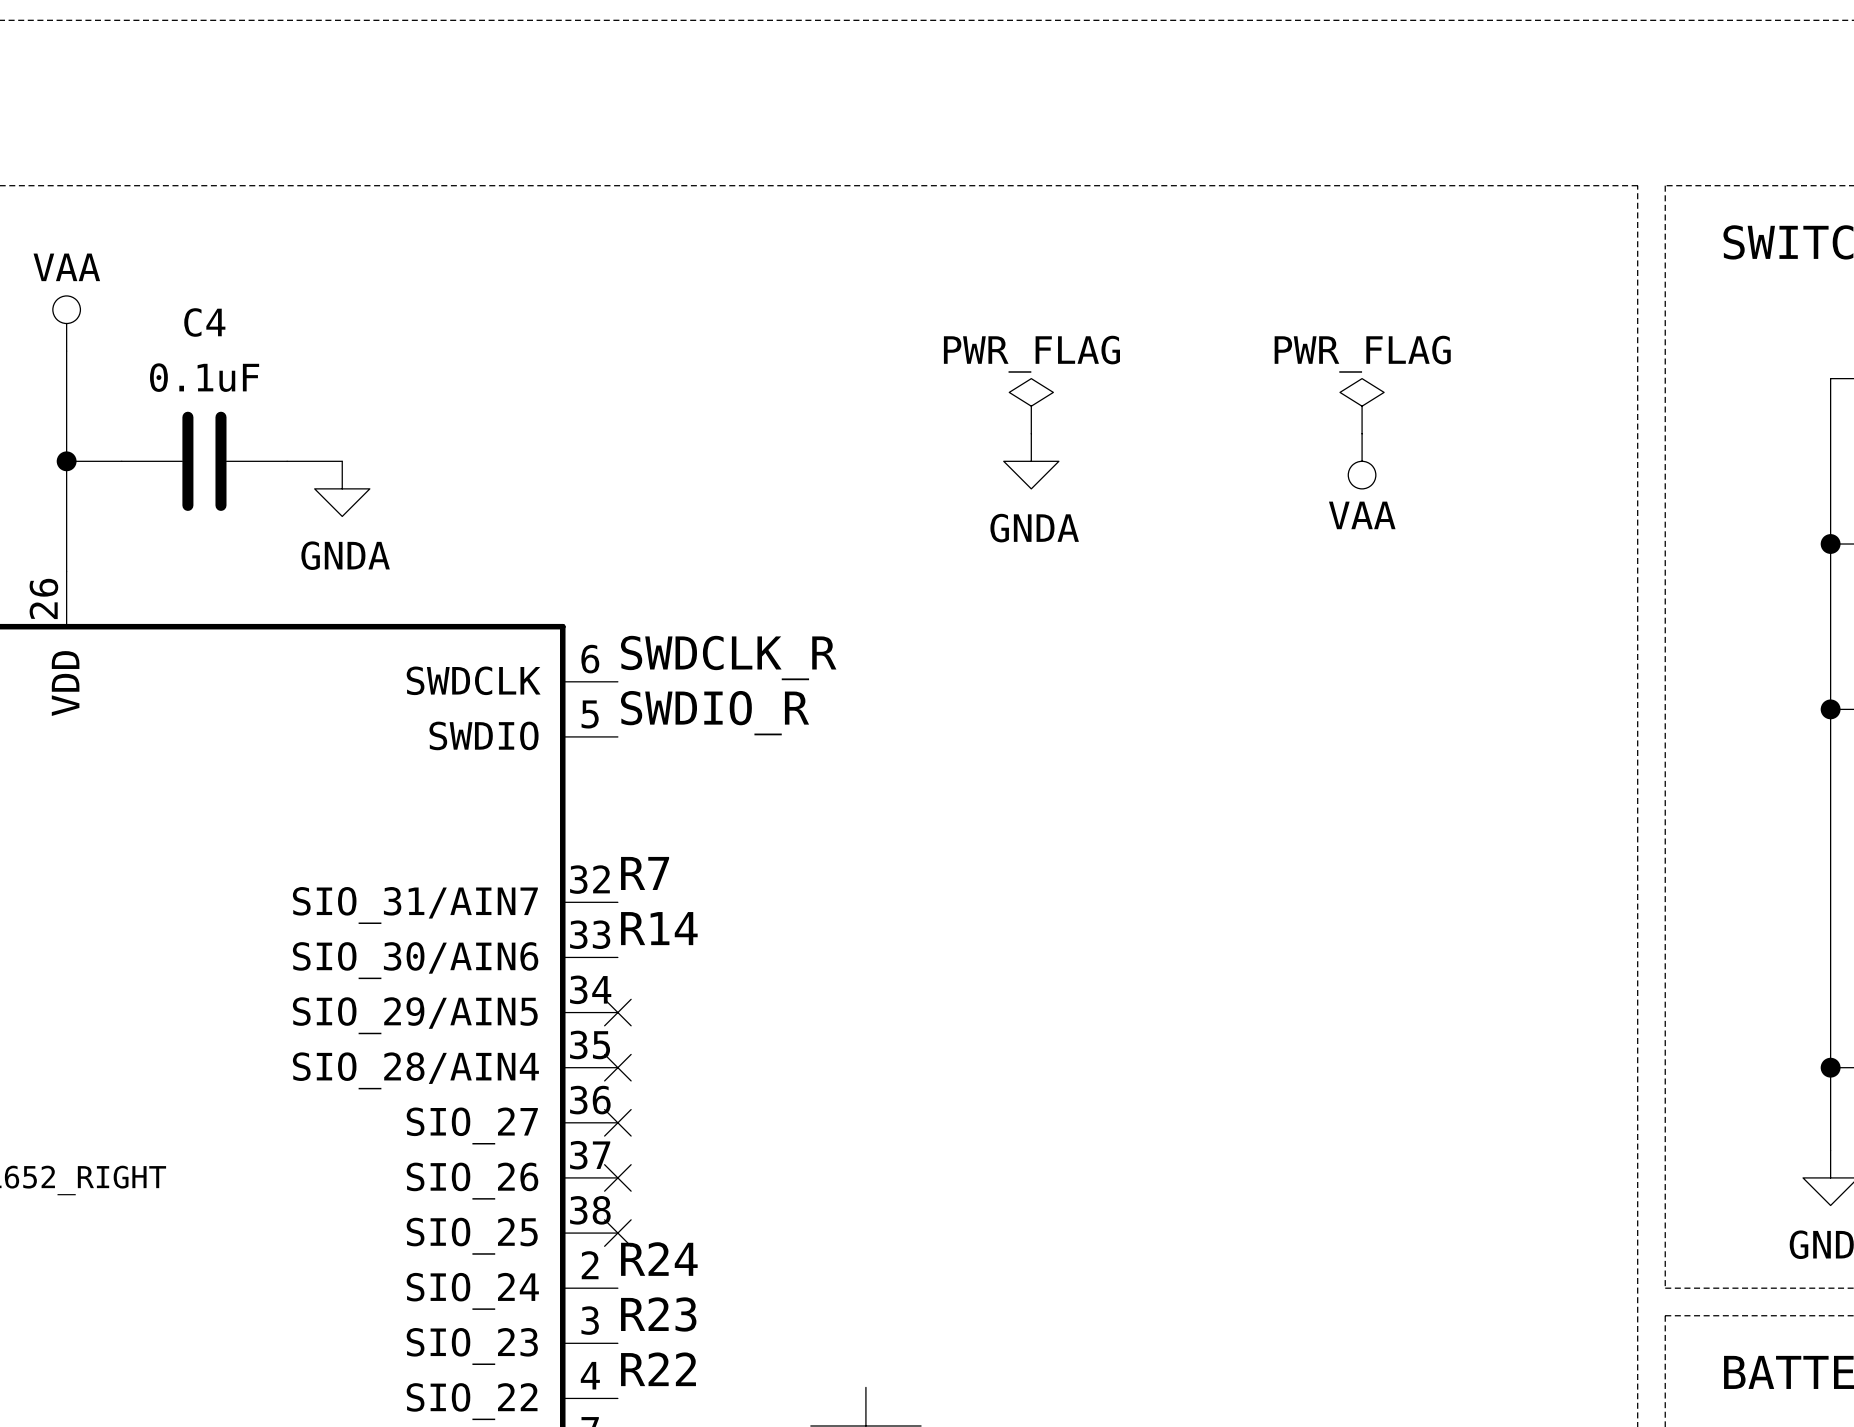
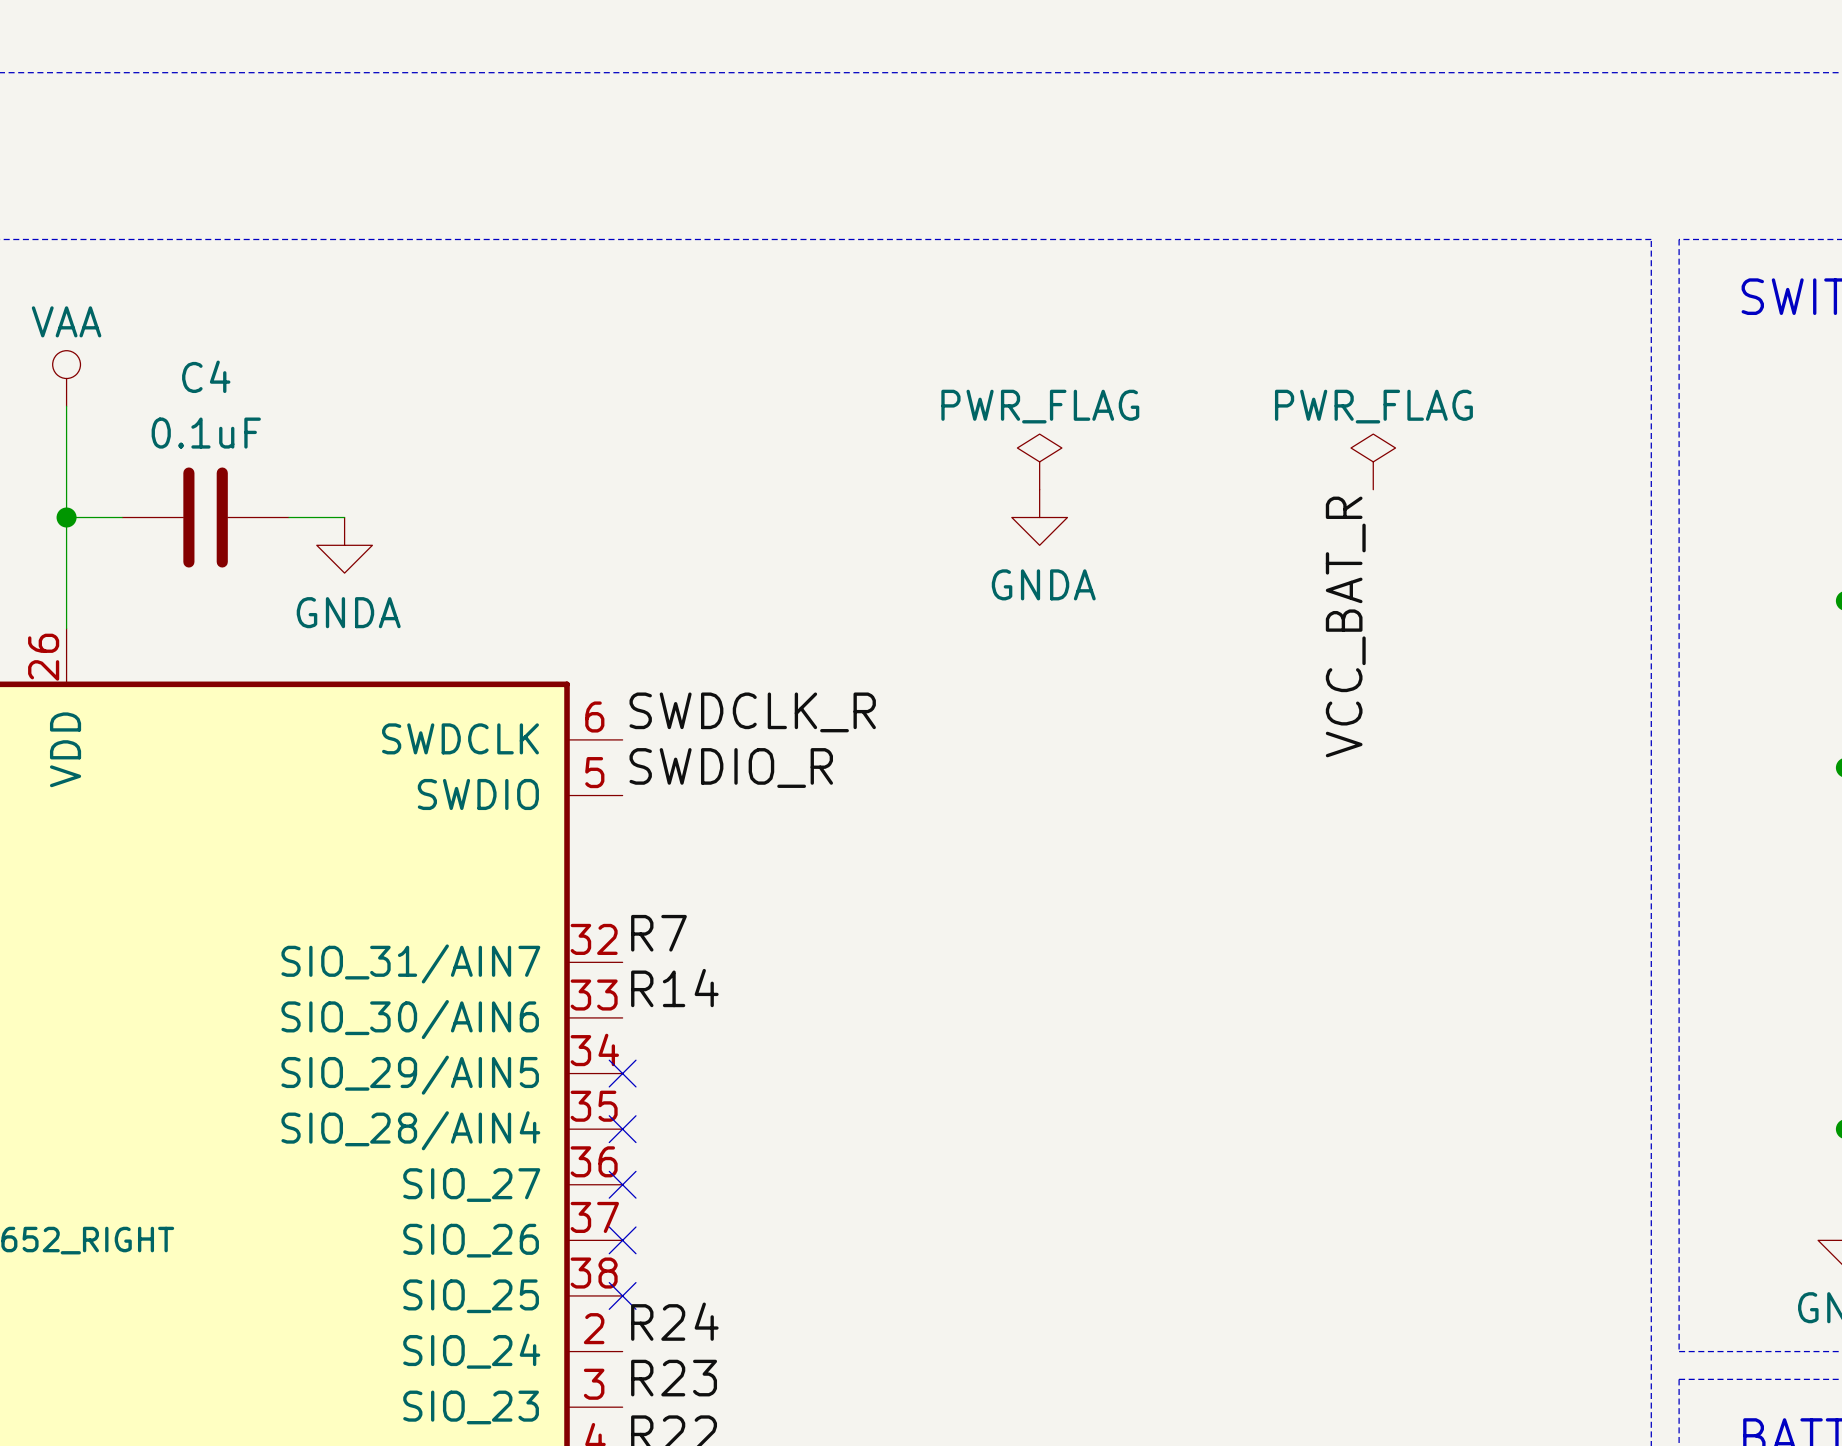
power symbol: VAA (1362, 461) -> none
label: none -> VCC_BAT_R (1345, 626)

